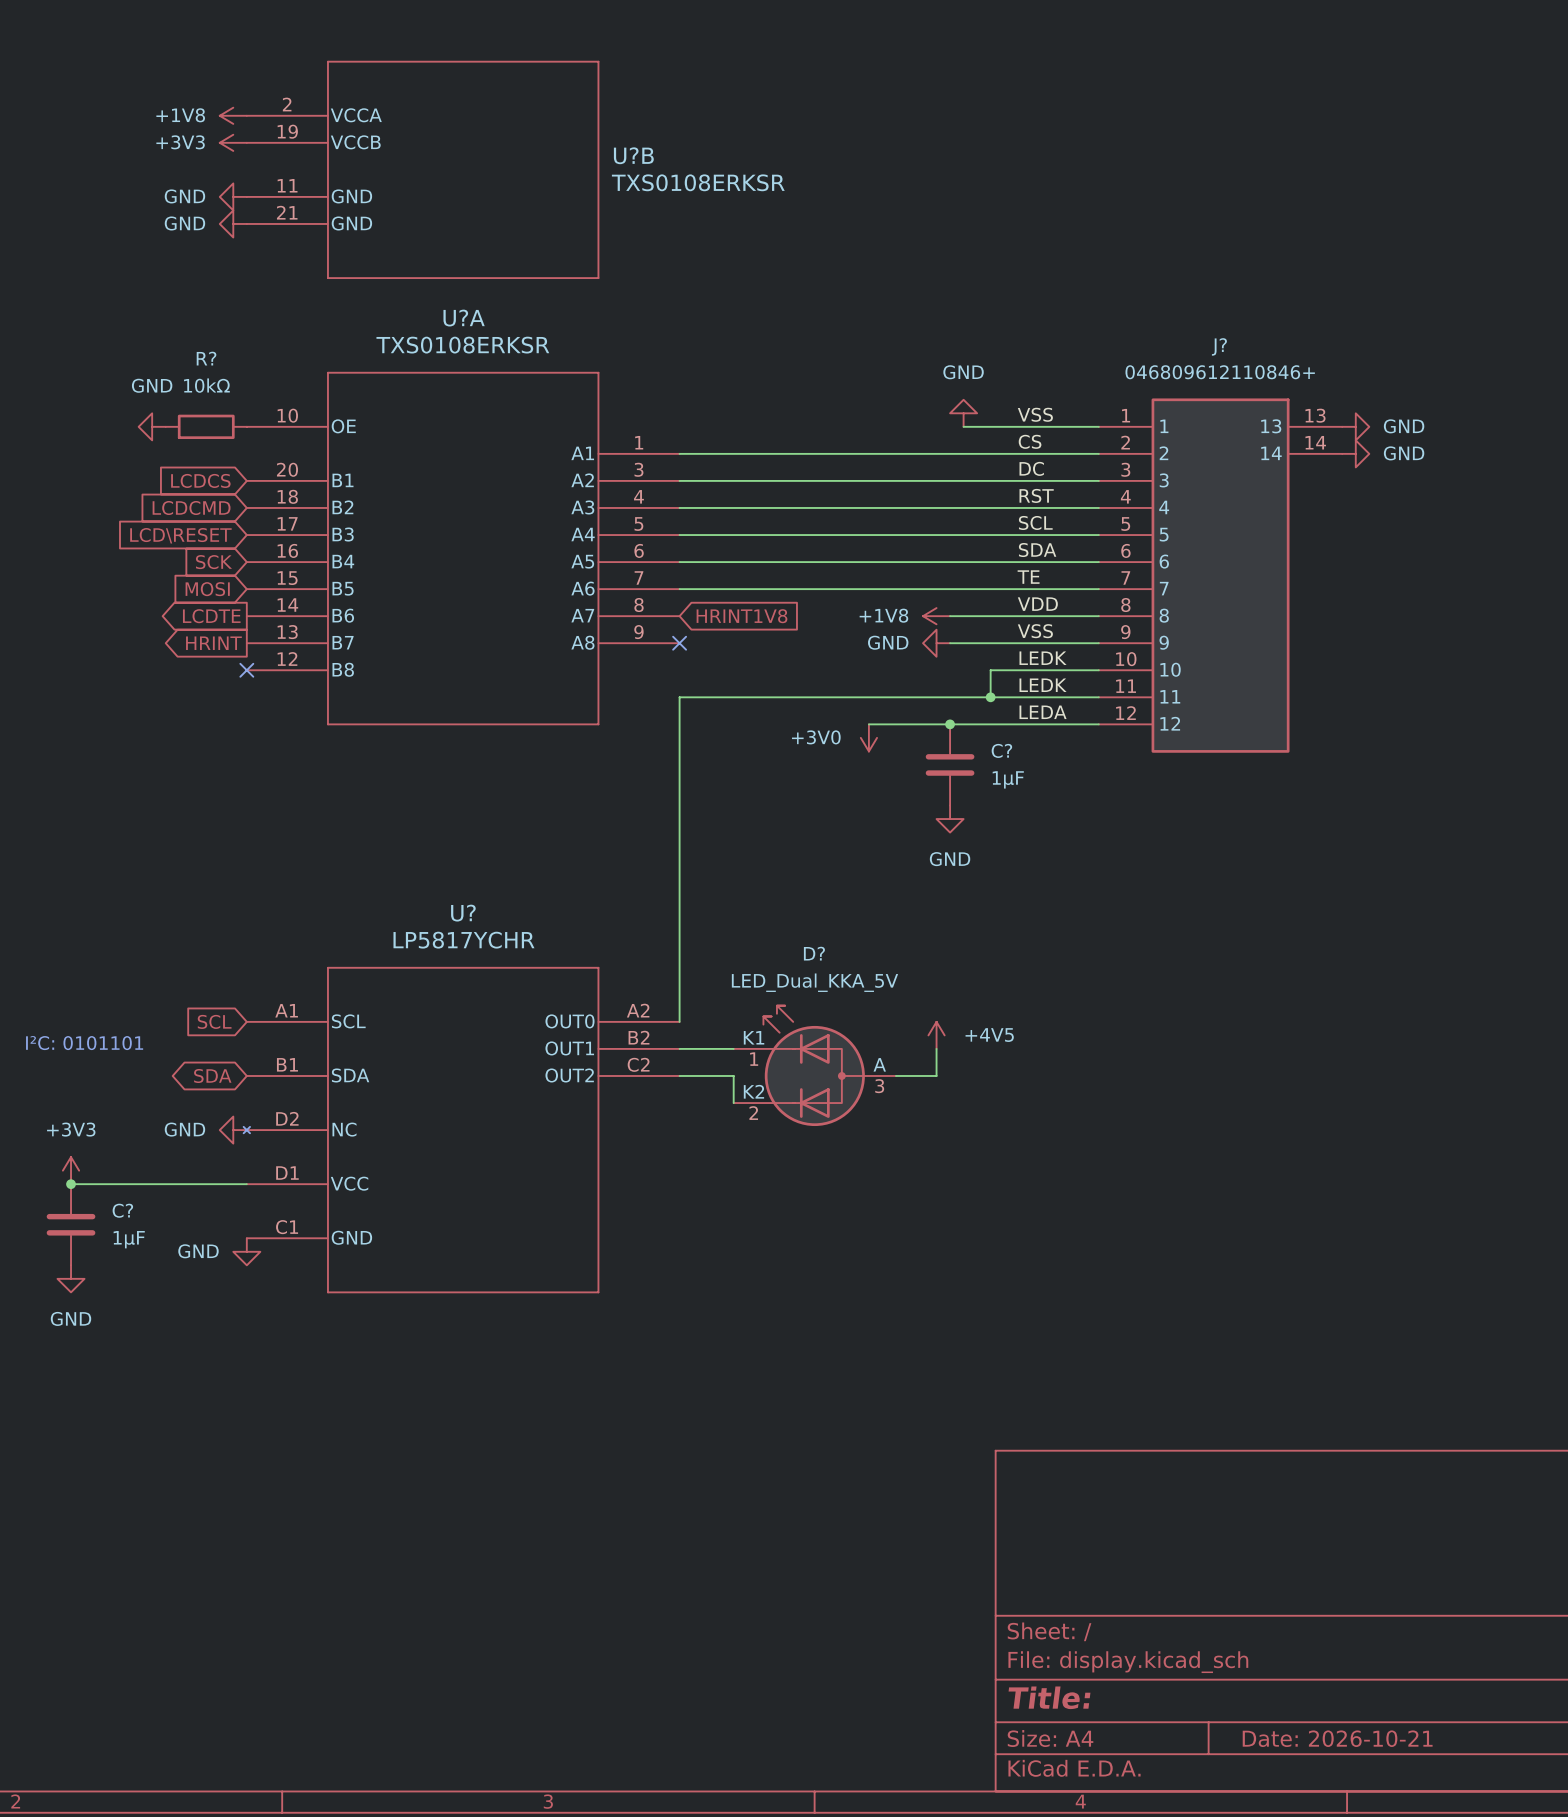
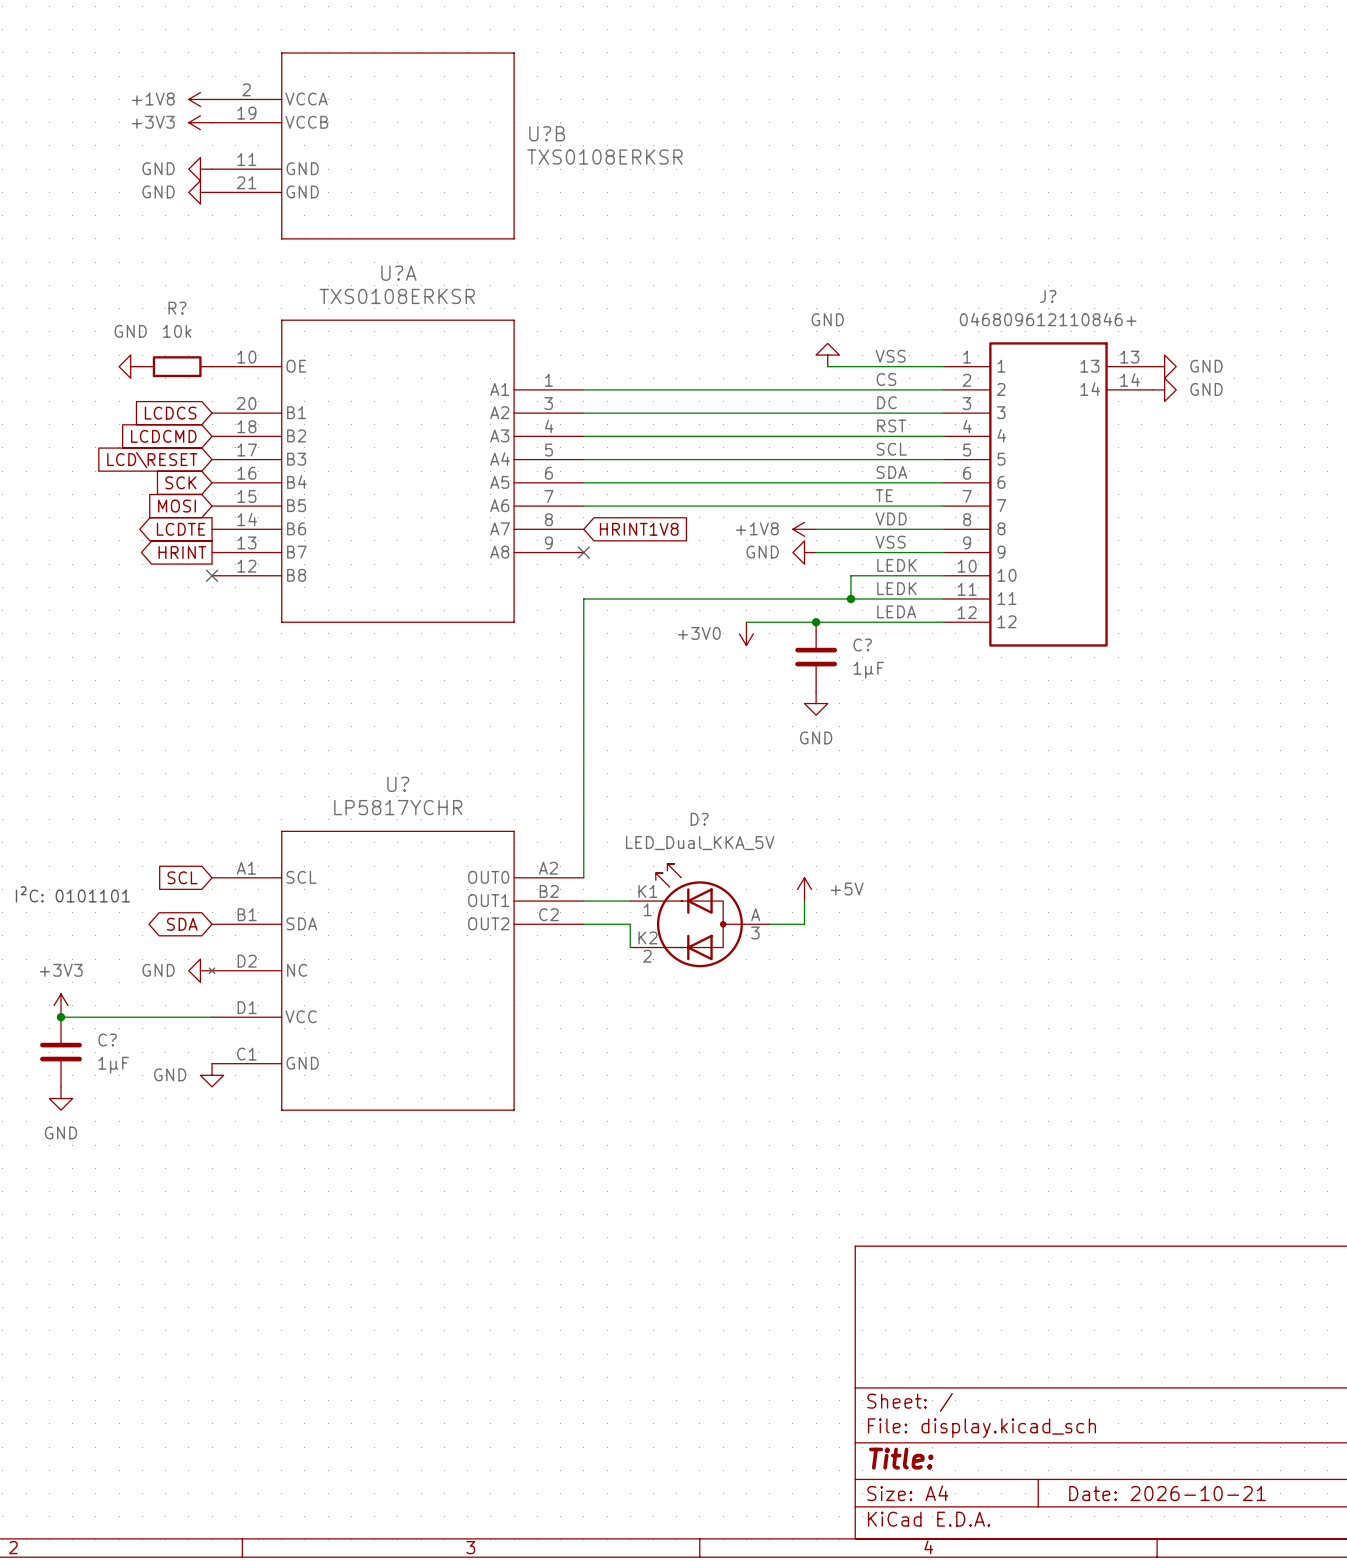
R? value: 10kΩ (206, 385) -> 10k (177, 331)
power symbol: +4V5 (936, 1035) -> +5V (804, 889)

